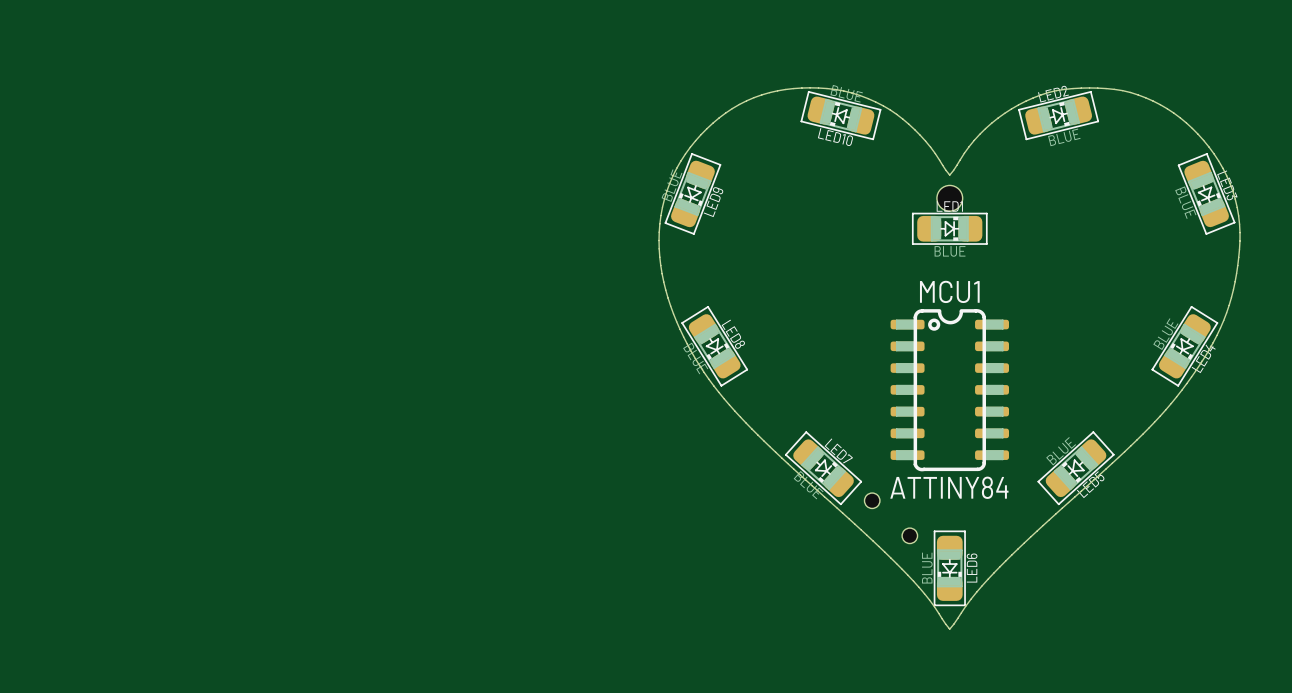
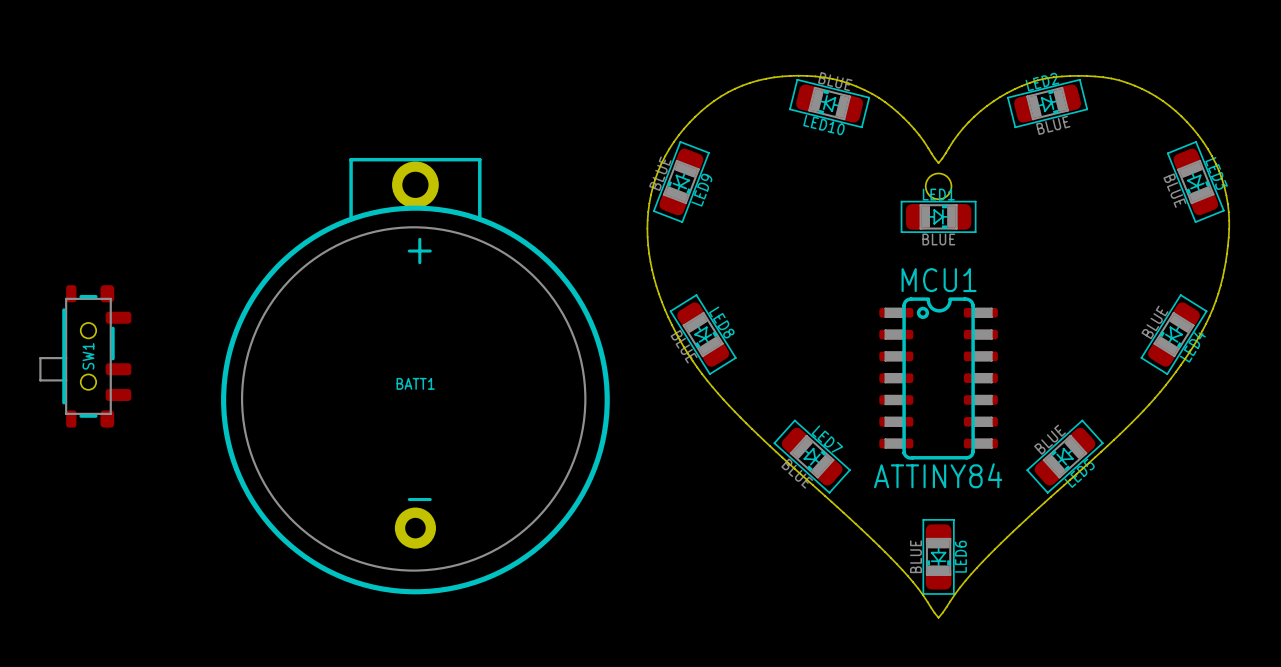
SW1: none -> (85, 356)
BATT1: none -> (415, 376)
part: (891, 518) -> none

